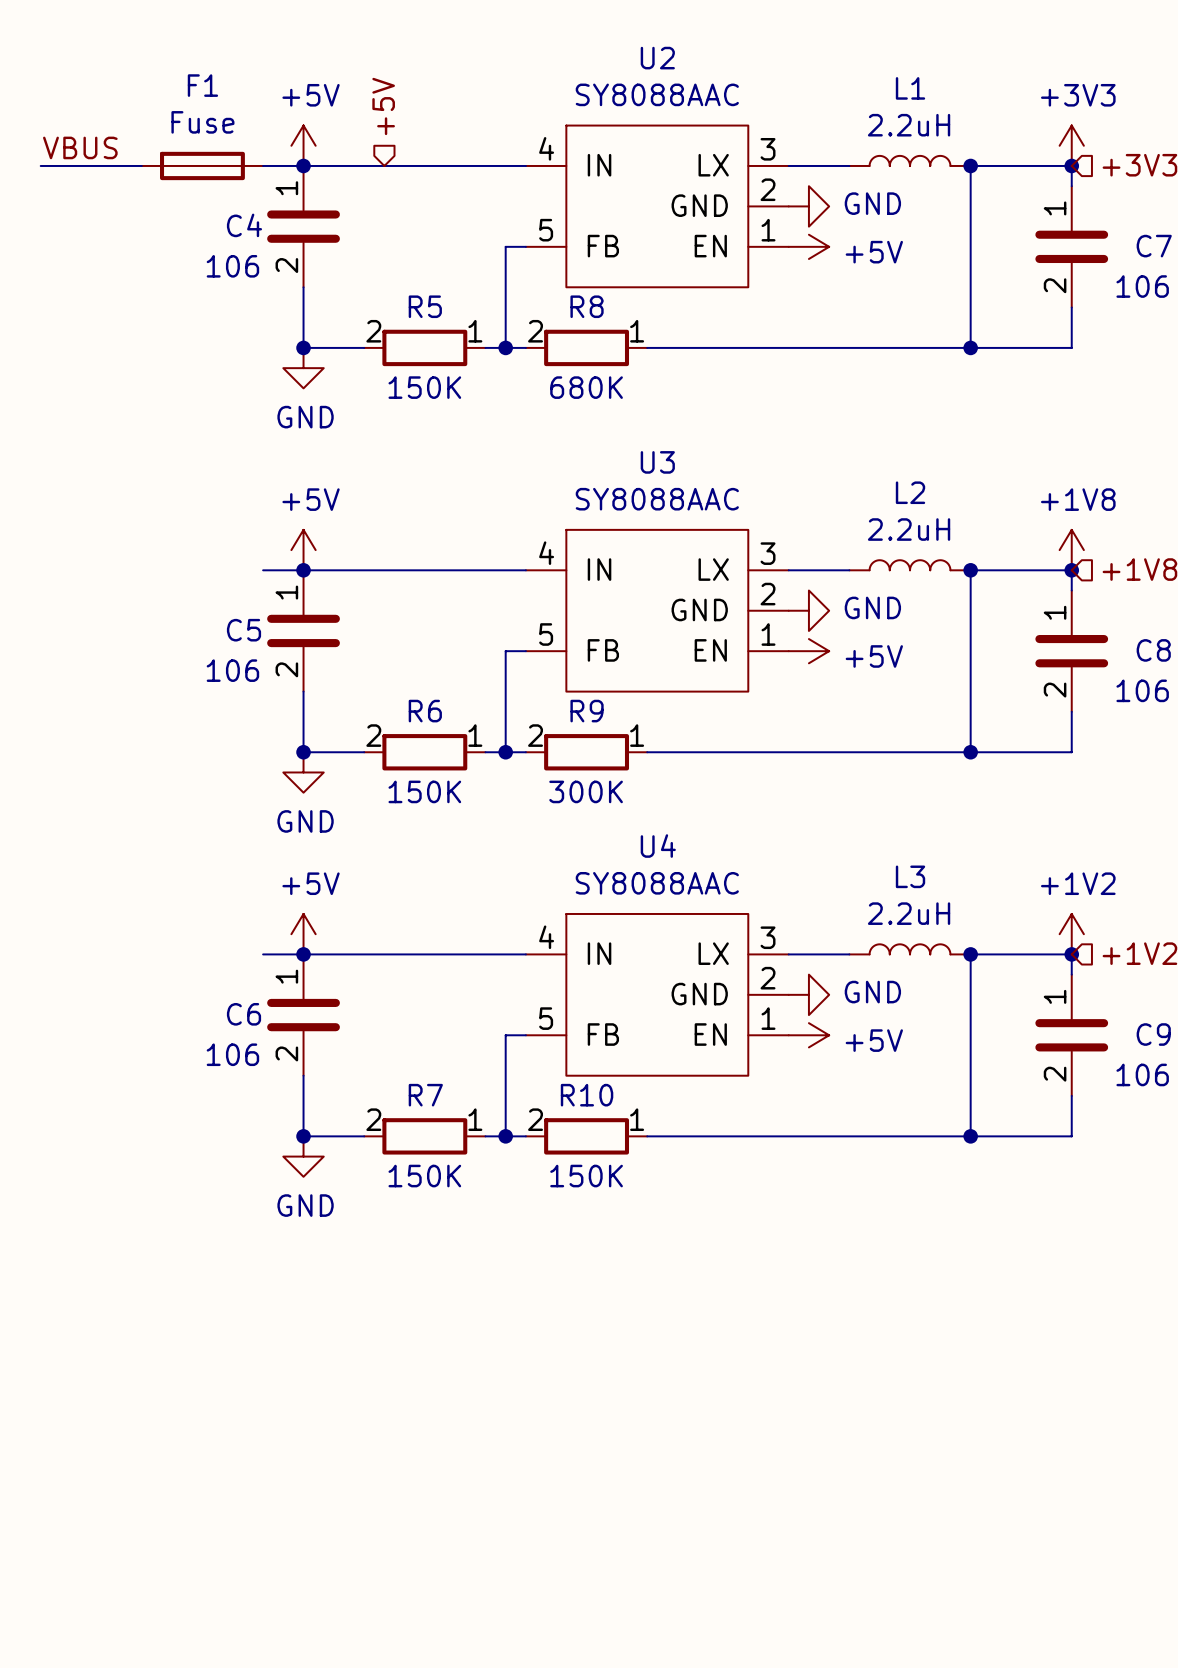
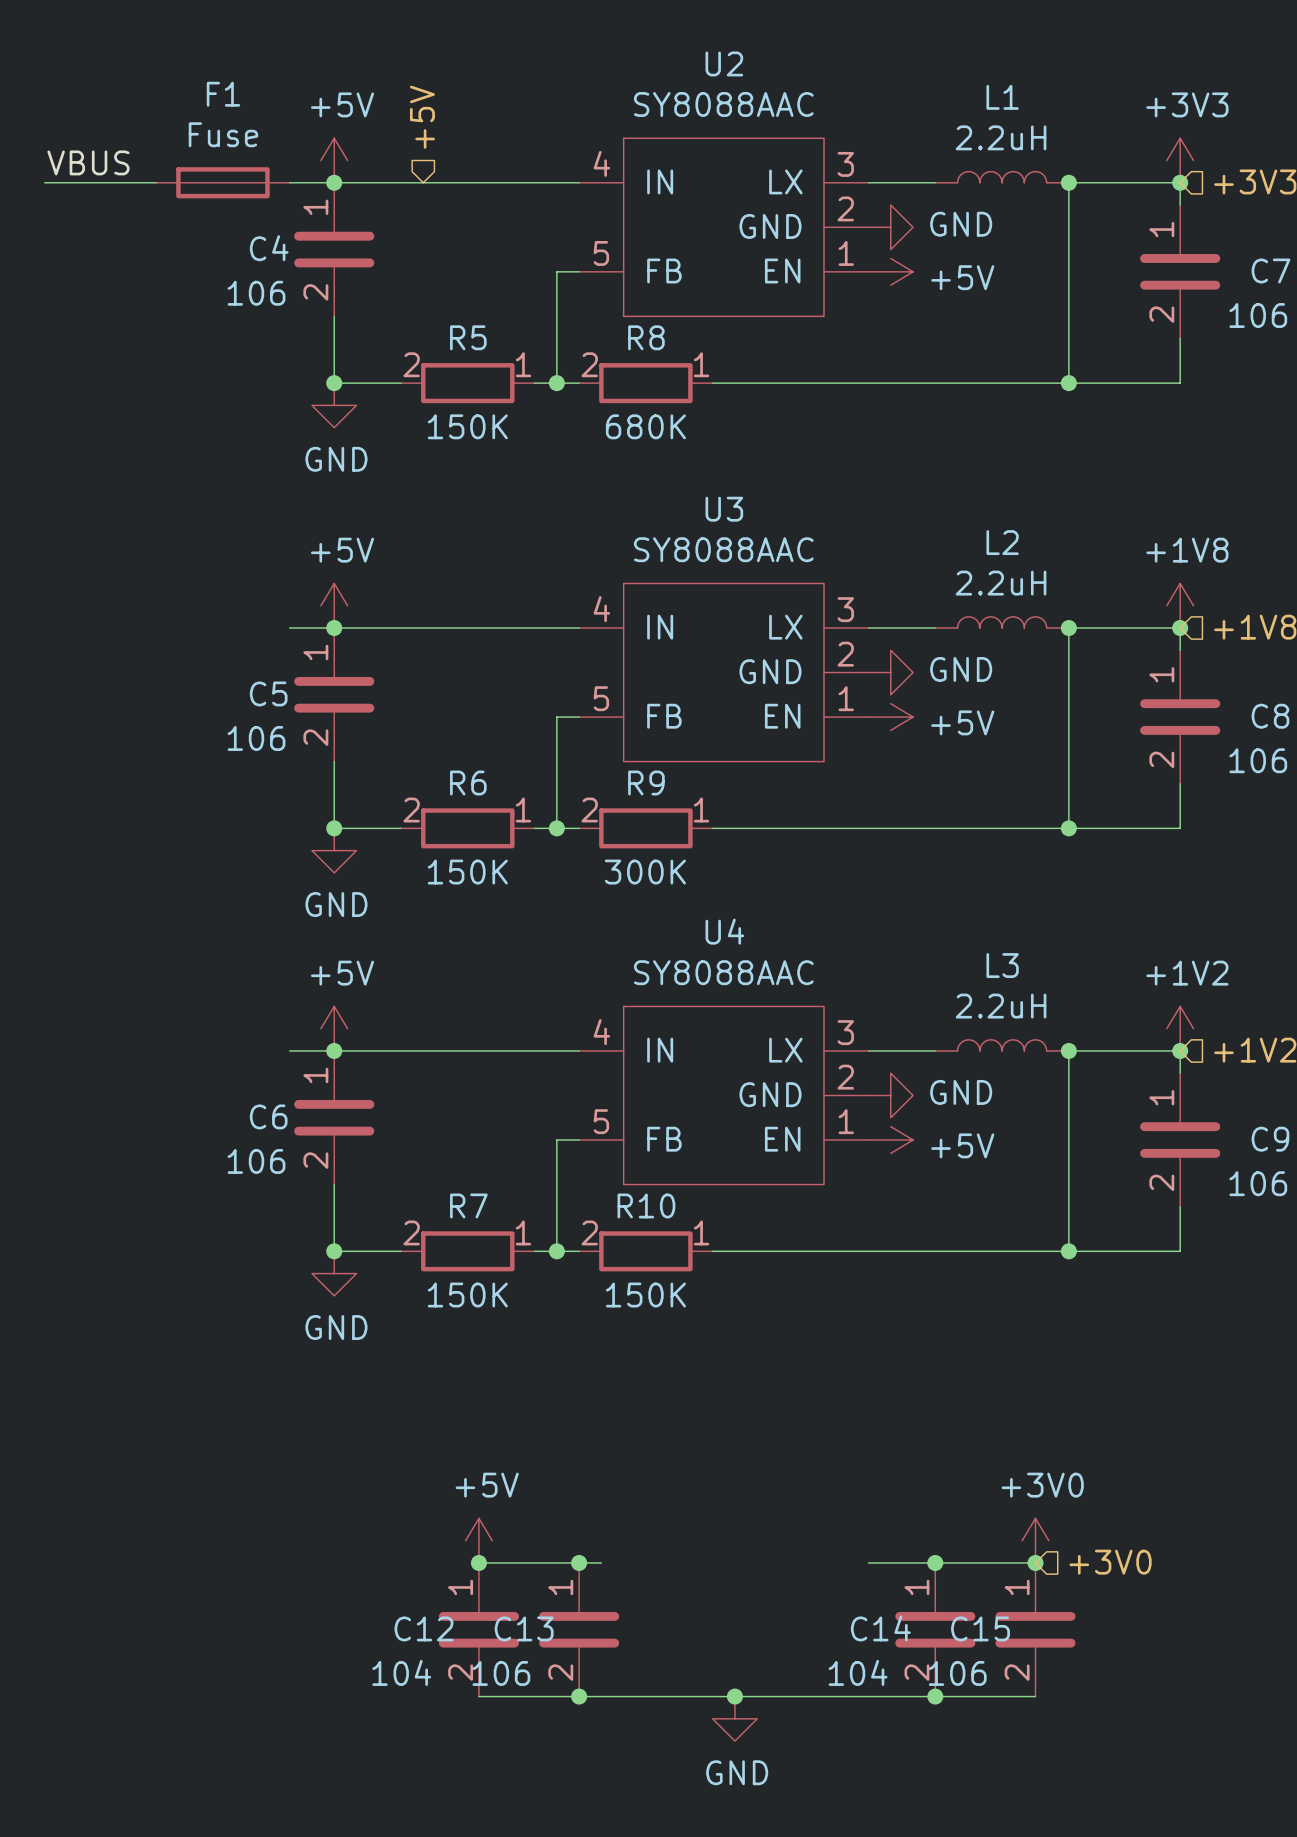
power symbol: none -> +5V (478, 1540)
power symbol: none -> +3V0 (1035, 1540)
hierarchical label: none -> +3V0 (1110, 1562)
wire: none -> (478, 1562) (601, 1562)
junction: none -> (478, 1562)
junction: none -> (579, 1562)
wire: none -> (868, 1562) (1035, 1562)
junction: none -> (935, 1562)
junction: none -> (1035, 1562)
C12: none -> 104 (478, 1629)
C13: none -> 106 (579, 1629)
C14: none -> 104 (935, 1629)
C15: none -> 106 (1035, 1629)
wire: none -> (478, 1696) (1035, 1696)
junction: none -> (579, 1696)
junction: none -> (734, 1696)
junction: none -> (935, 1696)
power symbol: none -> GND (734, 1718)

